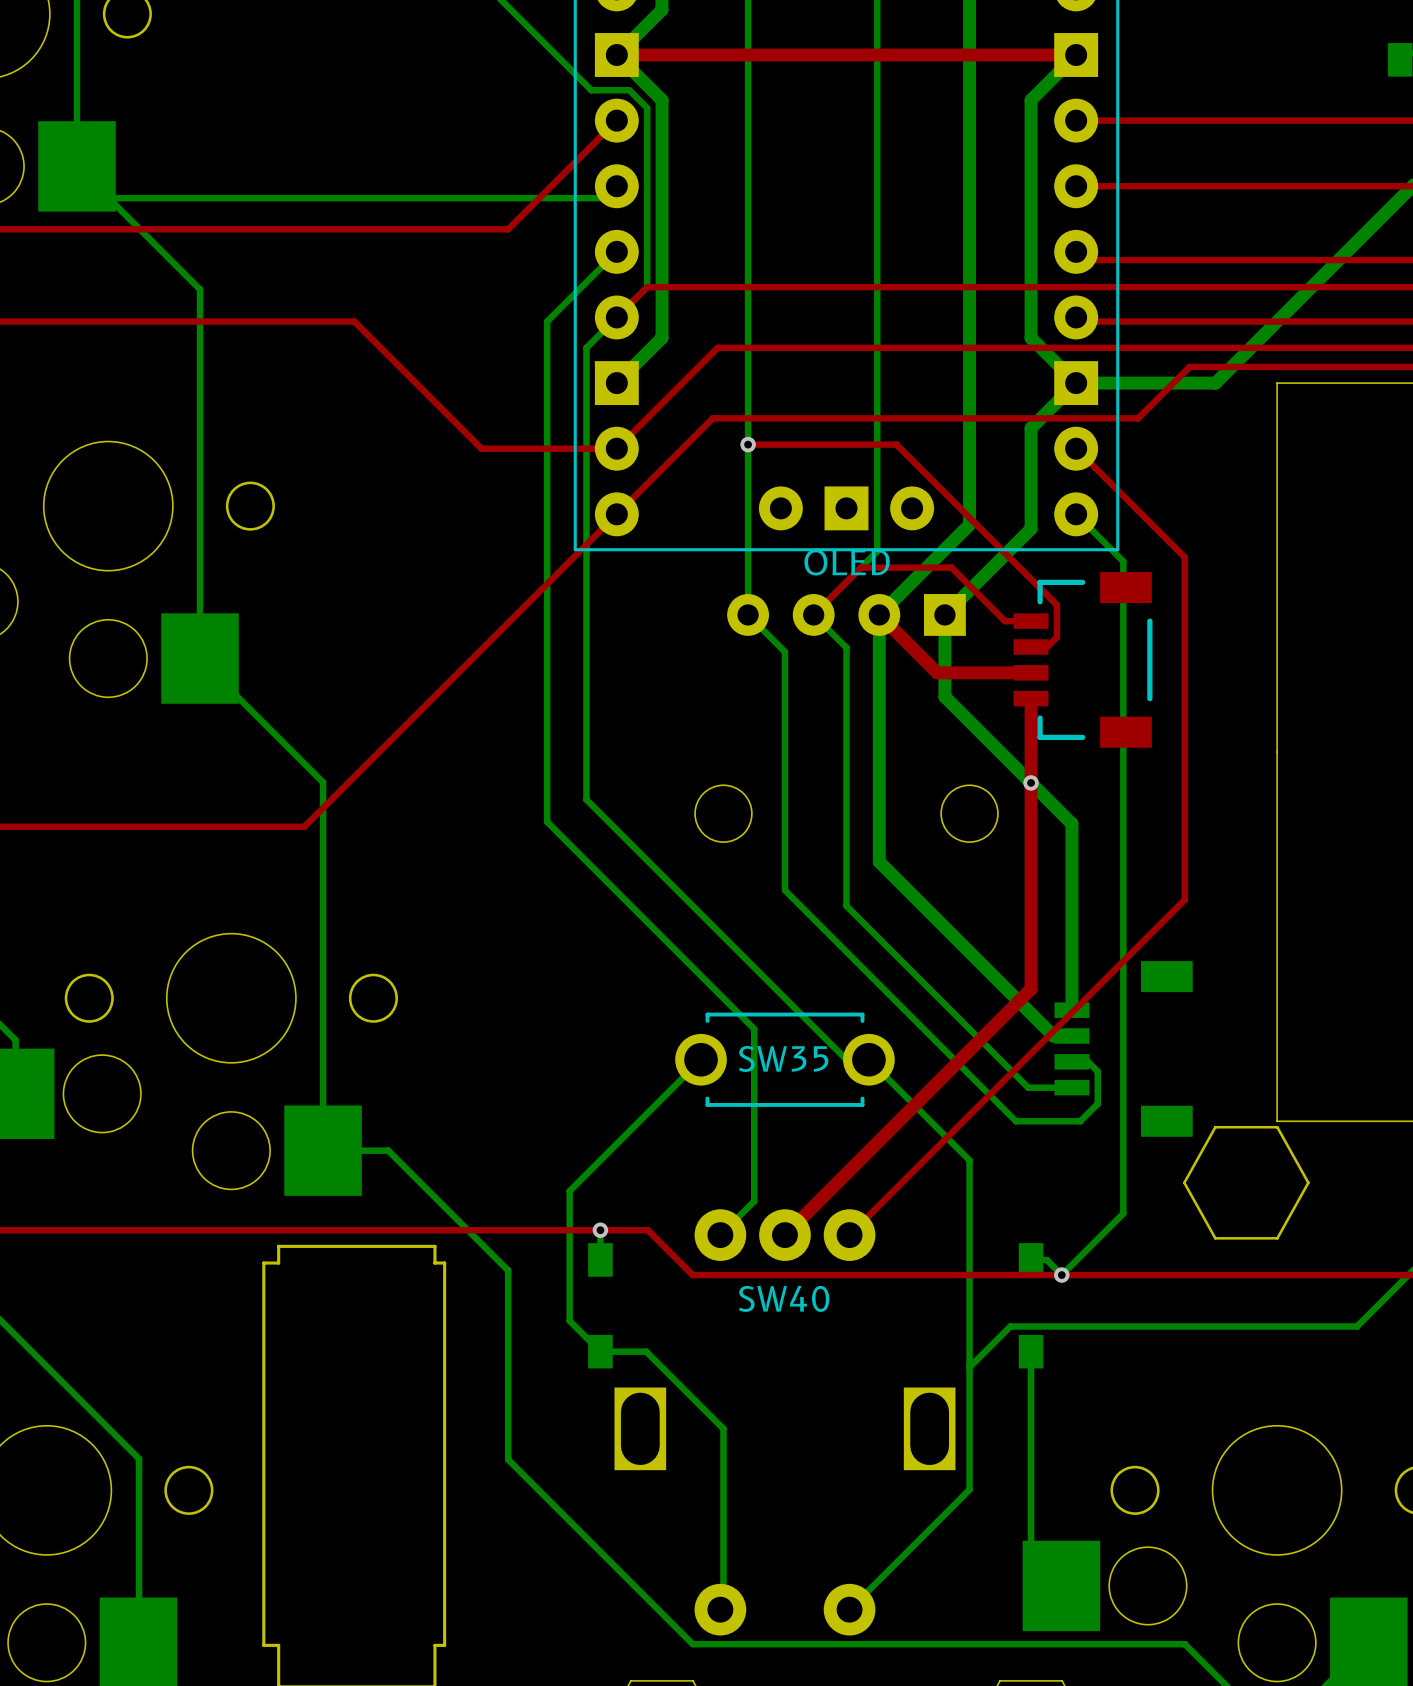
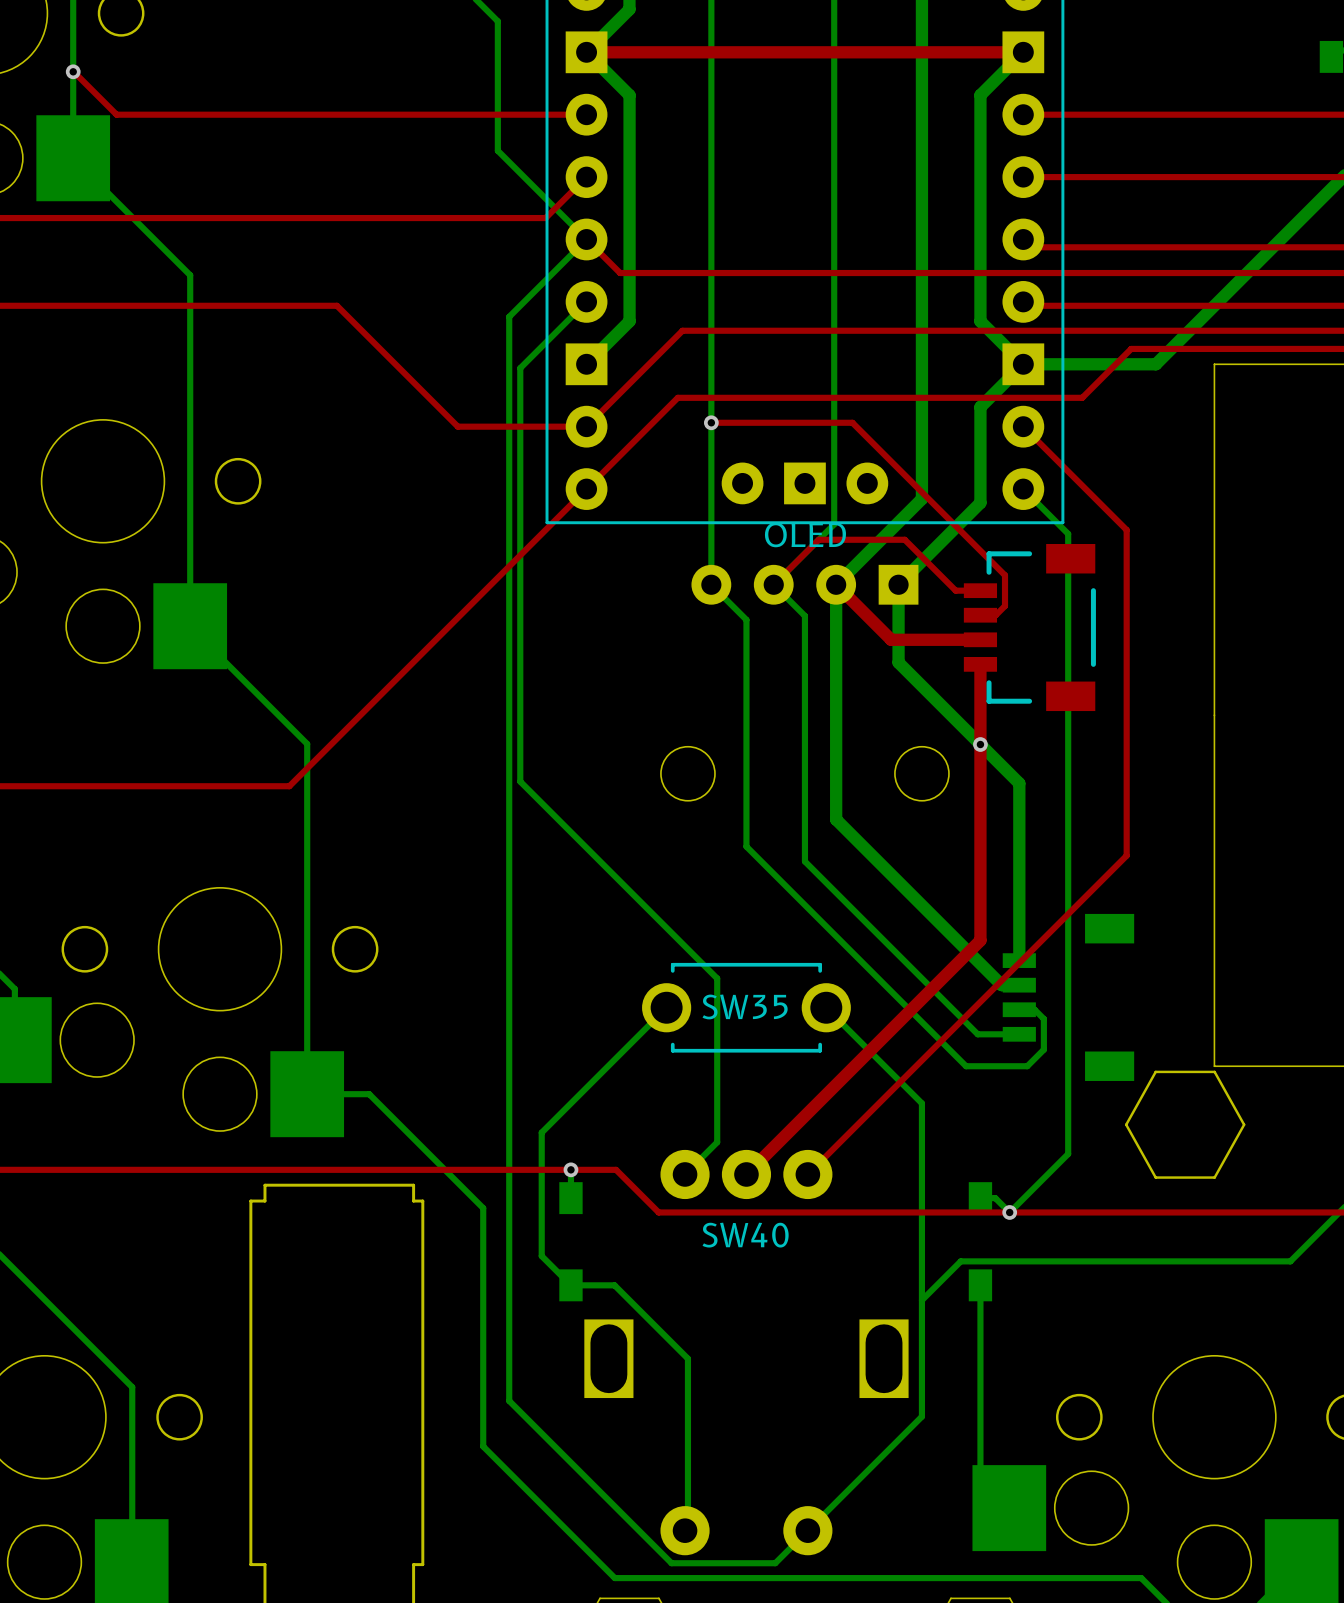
bottom track: (523, 22) (591, 90) (629, 90) (647, 108) (647, 287) (616, 317) -> (497, 21) (497, 150) (586, 239)
top track: none -> (73, 71) (116, 114) (586, 114)
via: none -> (73, 71)
top track: (616, 120) (508, 229) -> (586, 177) (545, 218) (483, 218)
bottom track: (108, 198) (604, 198) -> none
top track: (652, 287) (647, 287) (616, 317) -> (620, 273) (586, 239)
bottom track: (547, 321) (547, 387) -> (557, 330) (520, 368)
bottom track: none -> (520, 305) (509, 316) (509, 1400) (671, 1563) (775, 1563) (807, 1530)
bottom track: (586, 347) (586, 799) (846, 1059) -> none
bottom track: (508, 1459) (692, 1644) (1184, 1644) (1200, 1659) -> (483, 1387) (483, 1446) (614, 1578) (1141, 1578)

